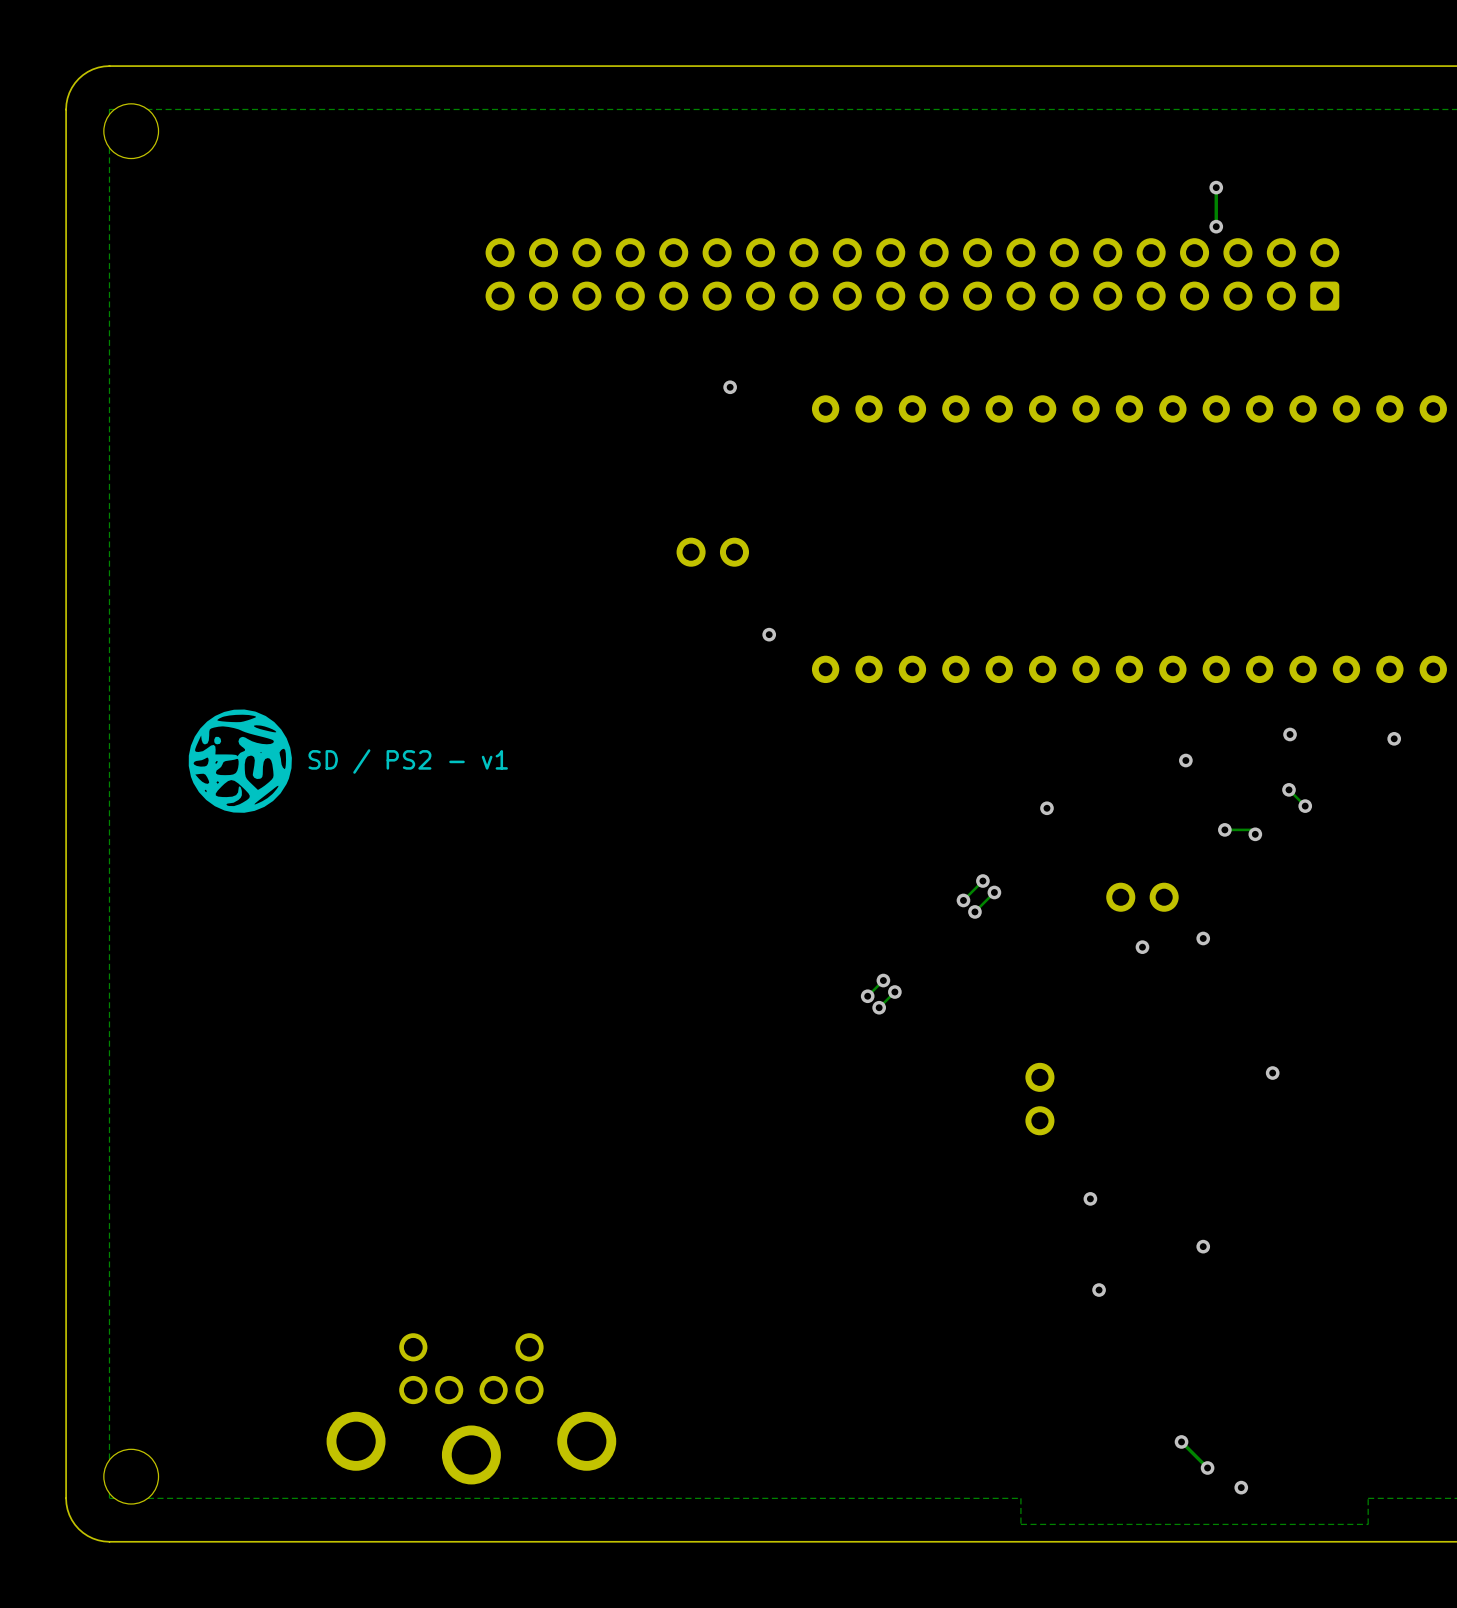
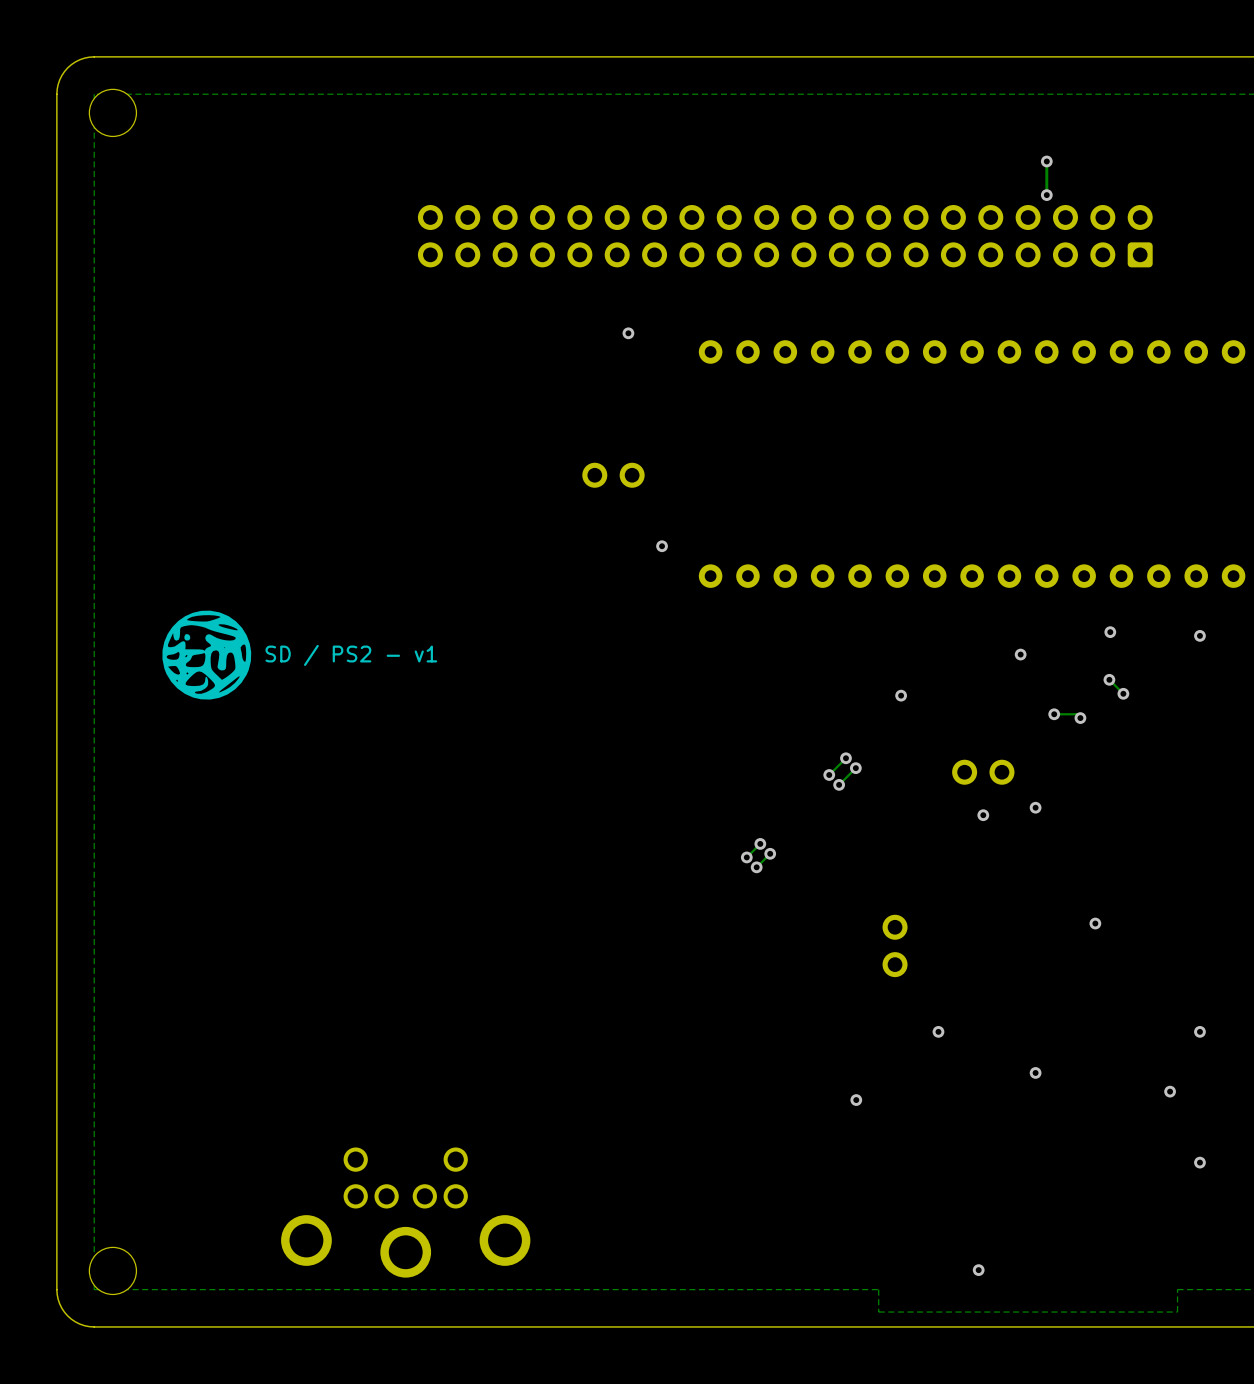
via: none -> (1199, 1031)
via: none -> (1170, 1091)
via: none -> (856, 1100)
via: (1099, 1290) -> none
via: none -> (1199, 1162)
track: (1181, 1441) (1207, 1467) -> none
via: (1181, 1441) -> none
via: (1207, 1467) -> none
via: none -> (978, 1270)
via: (1241, 1487) -> none

